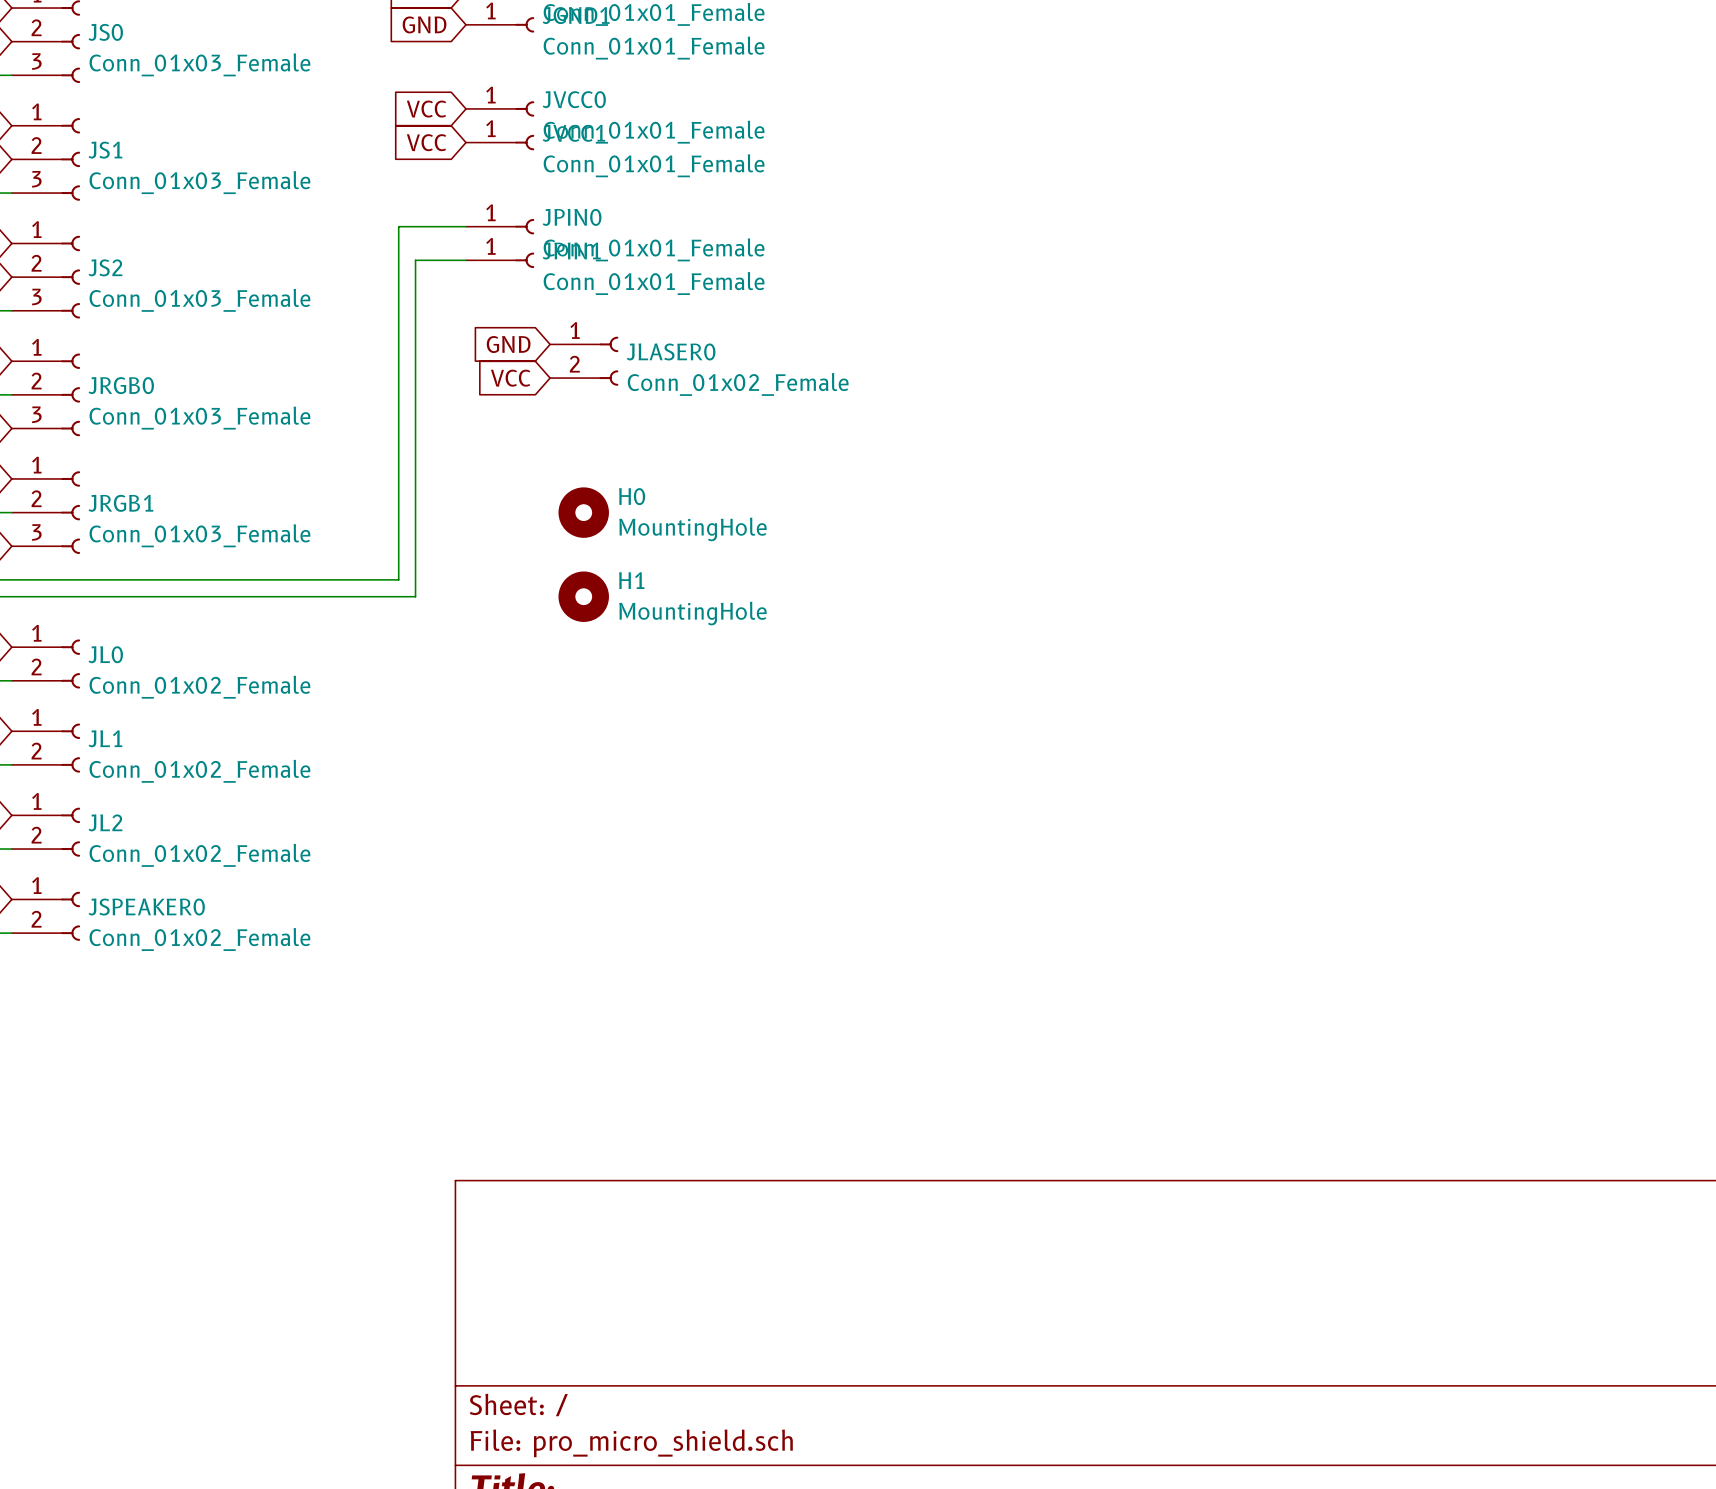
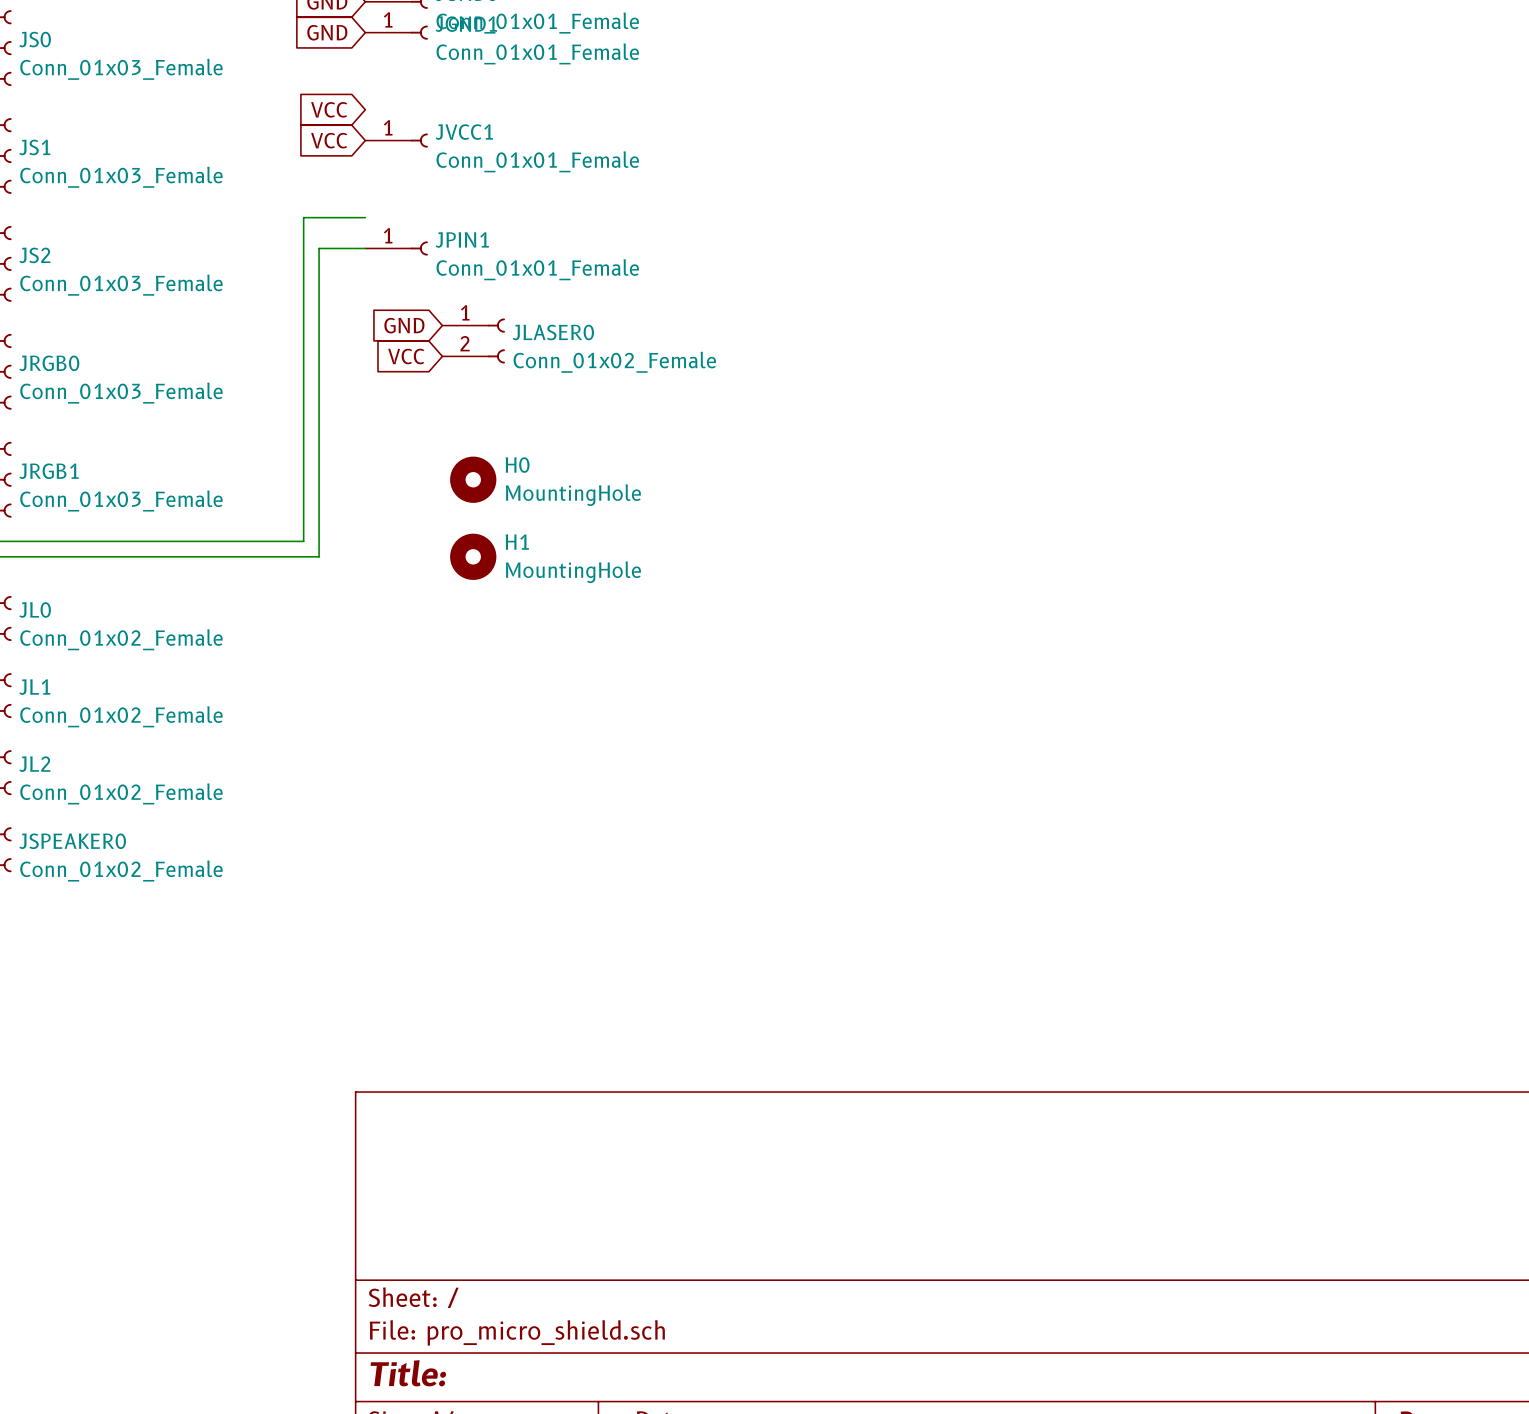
JVCC0: Conn_01x01_Female (500, 108) -> none
JPIN0: Conn_01x01_Female (500, 226) -> none

